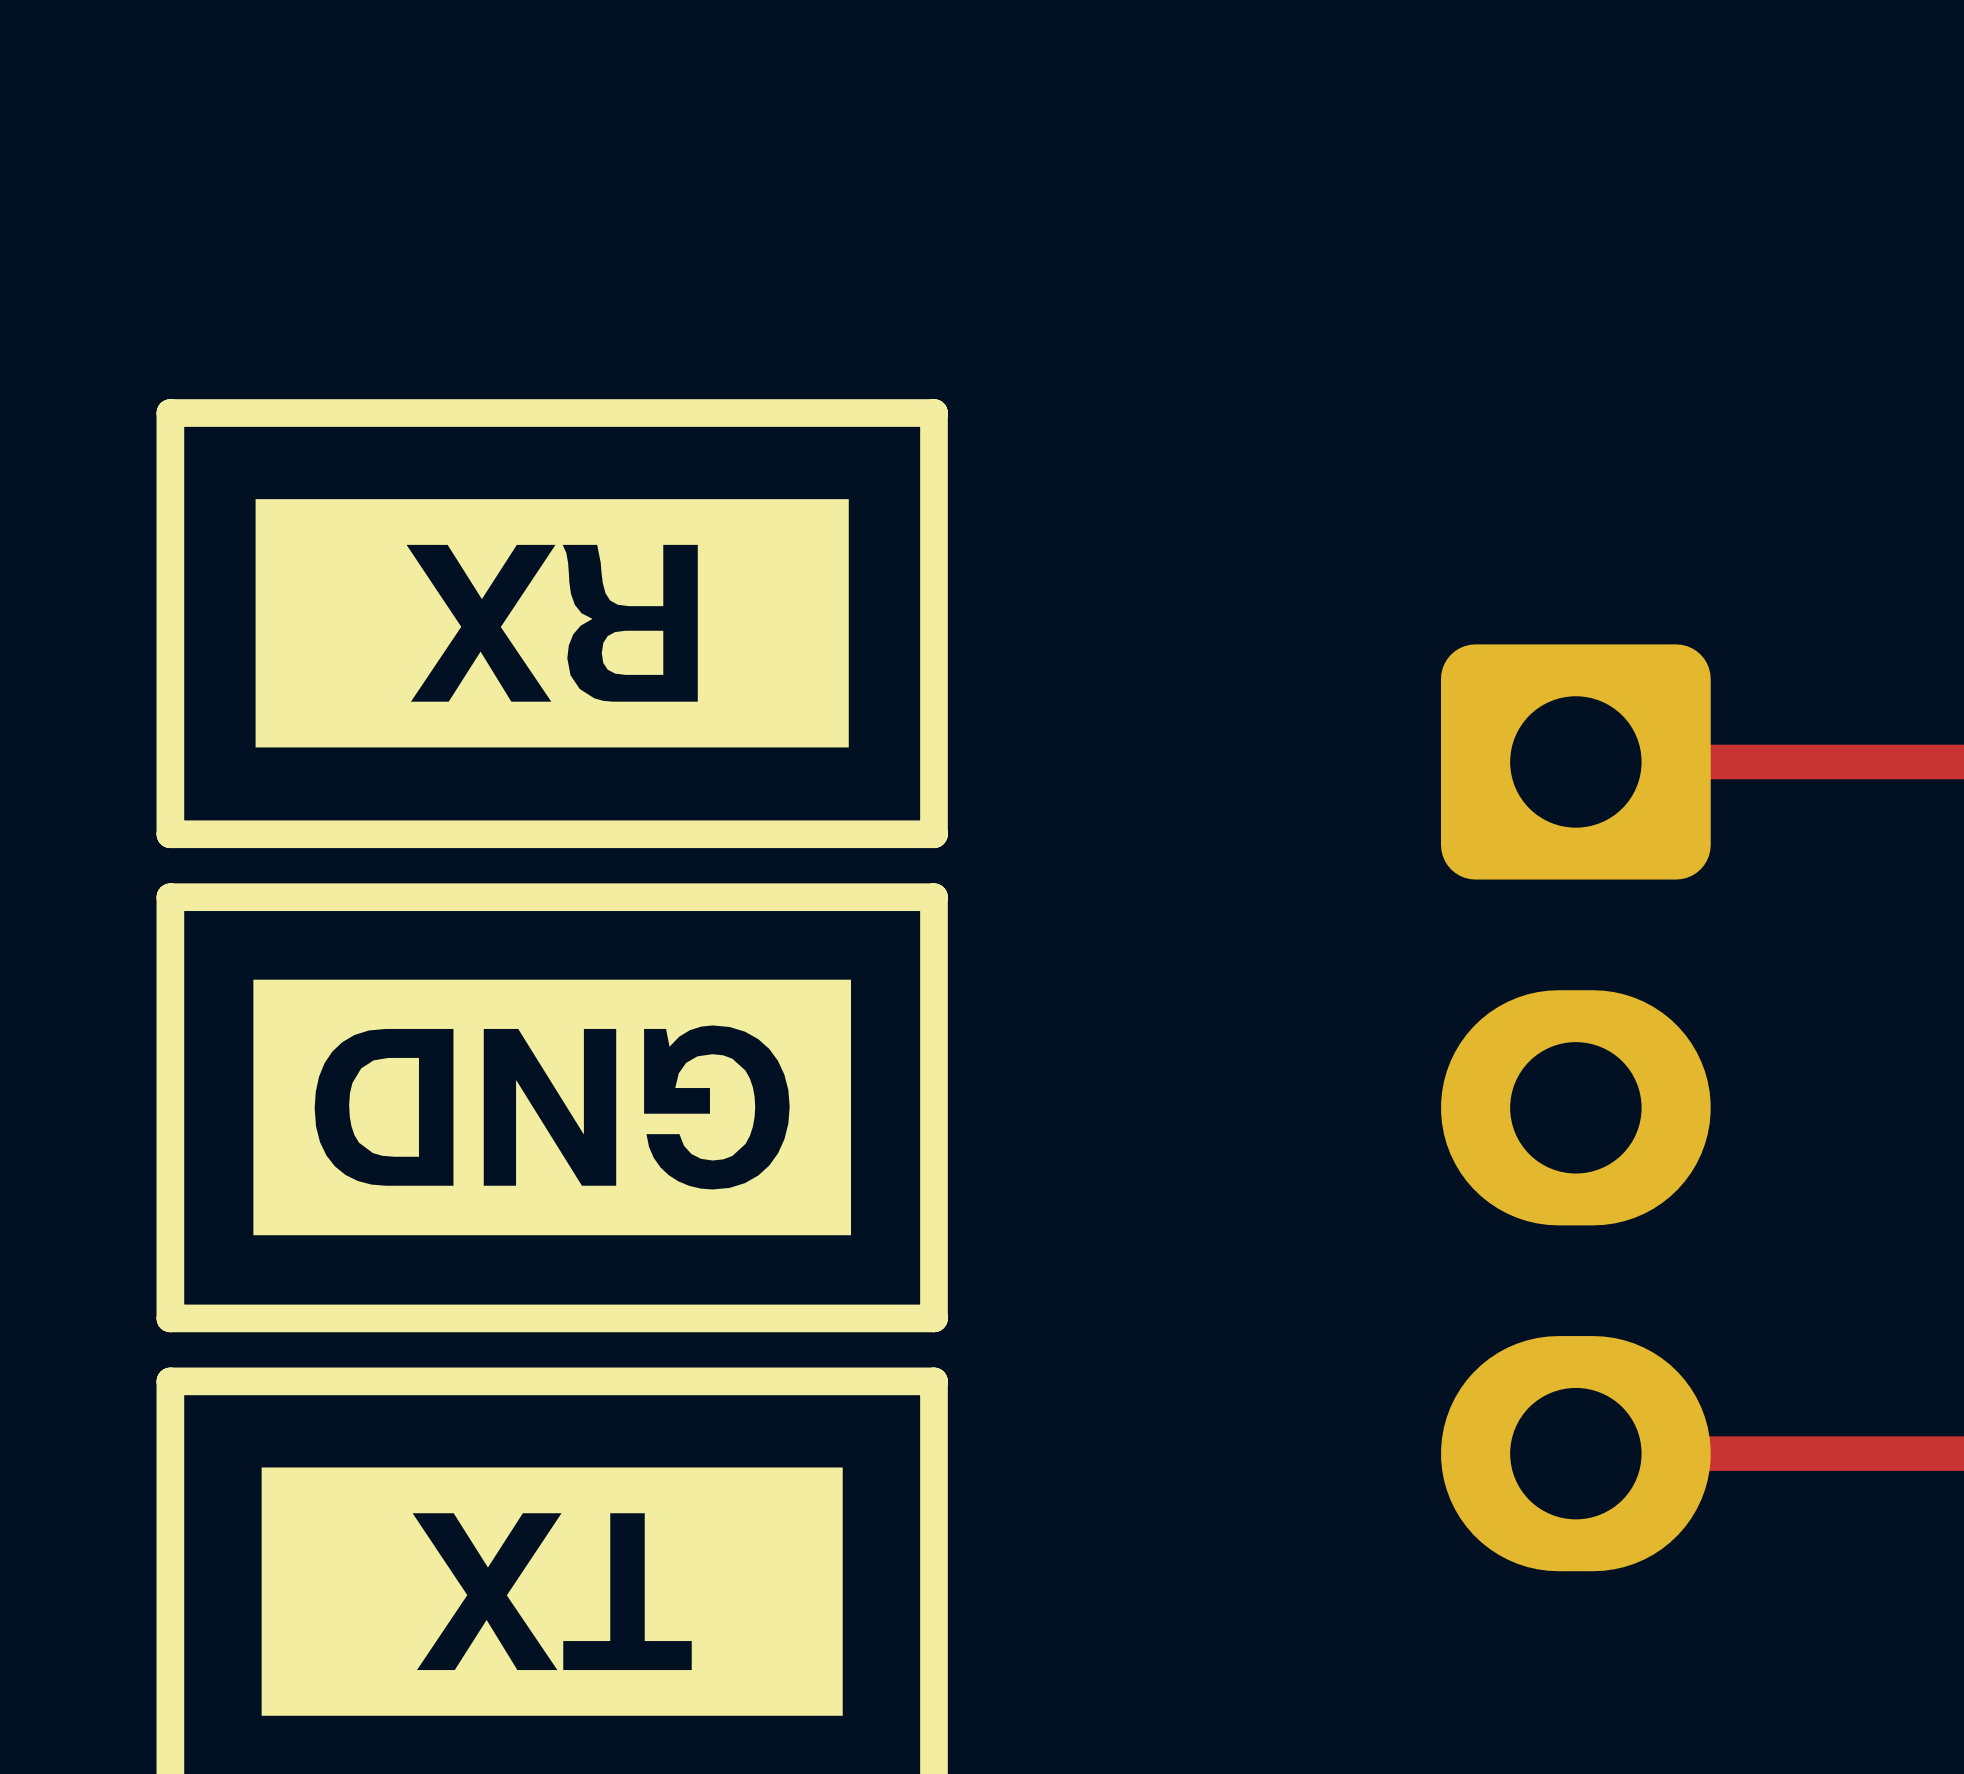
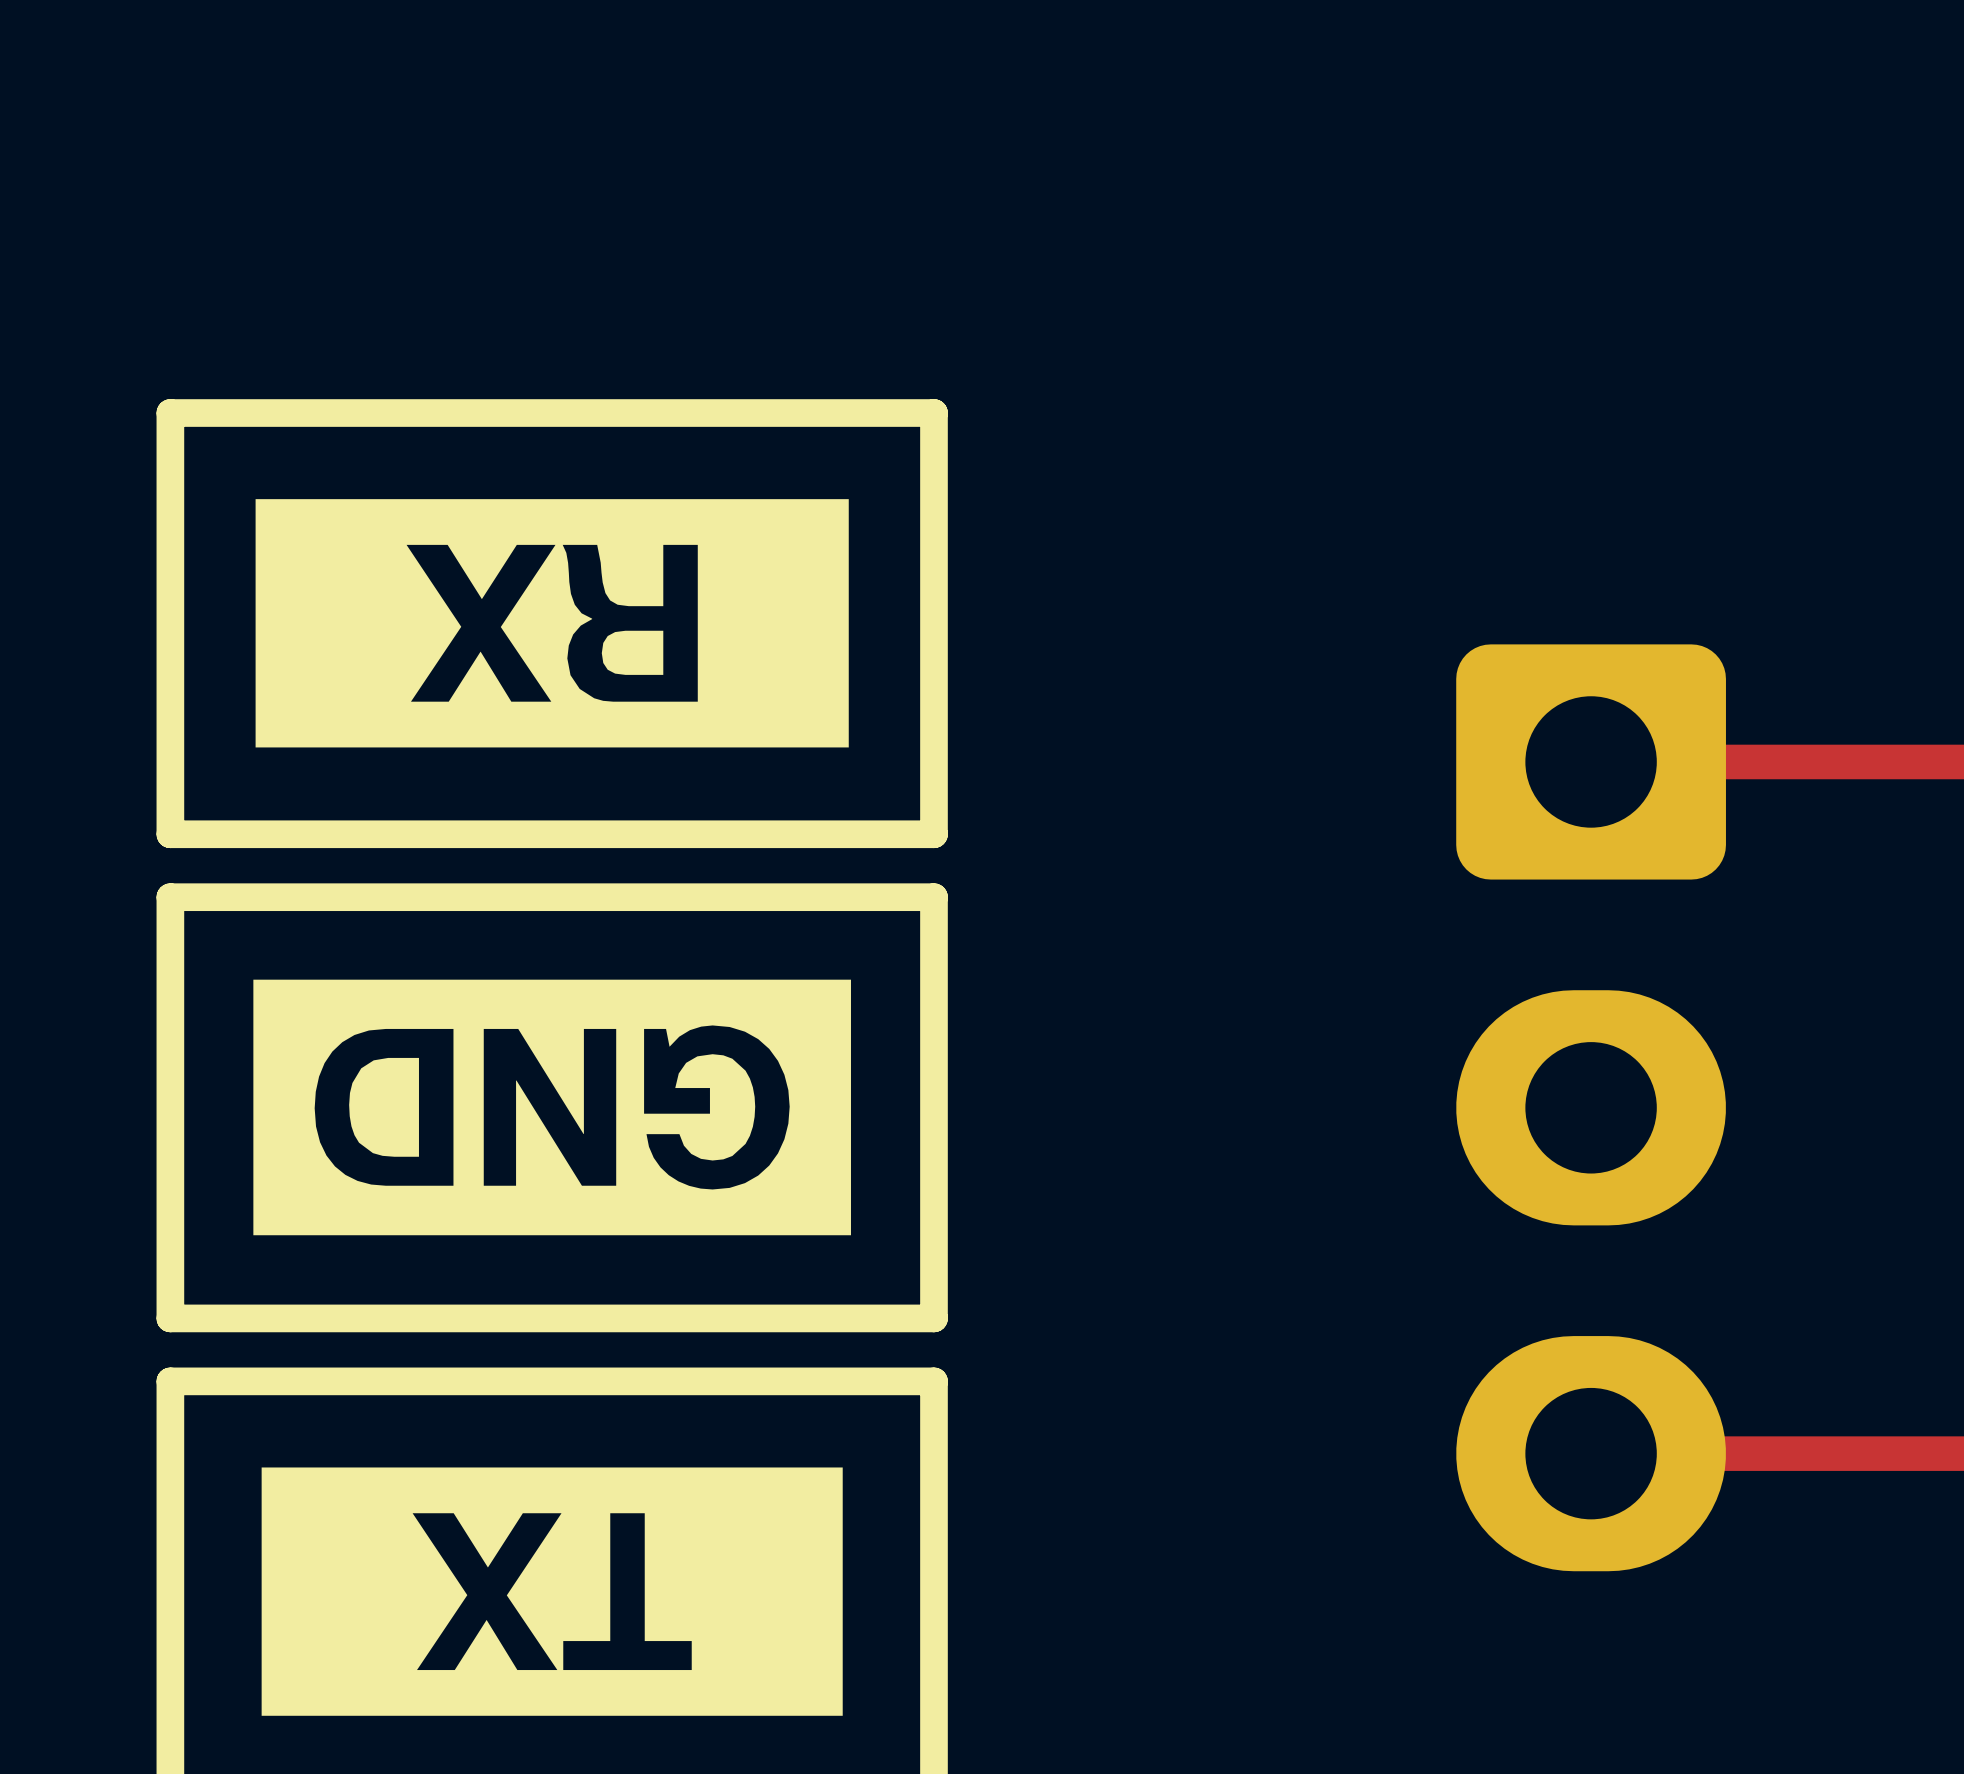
part position: (1575, 1107) -> (1591, 1107)

